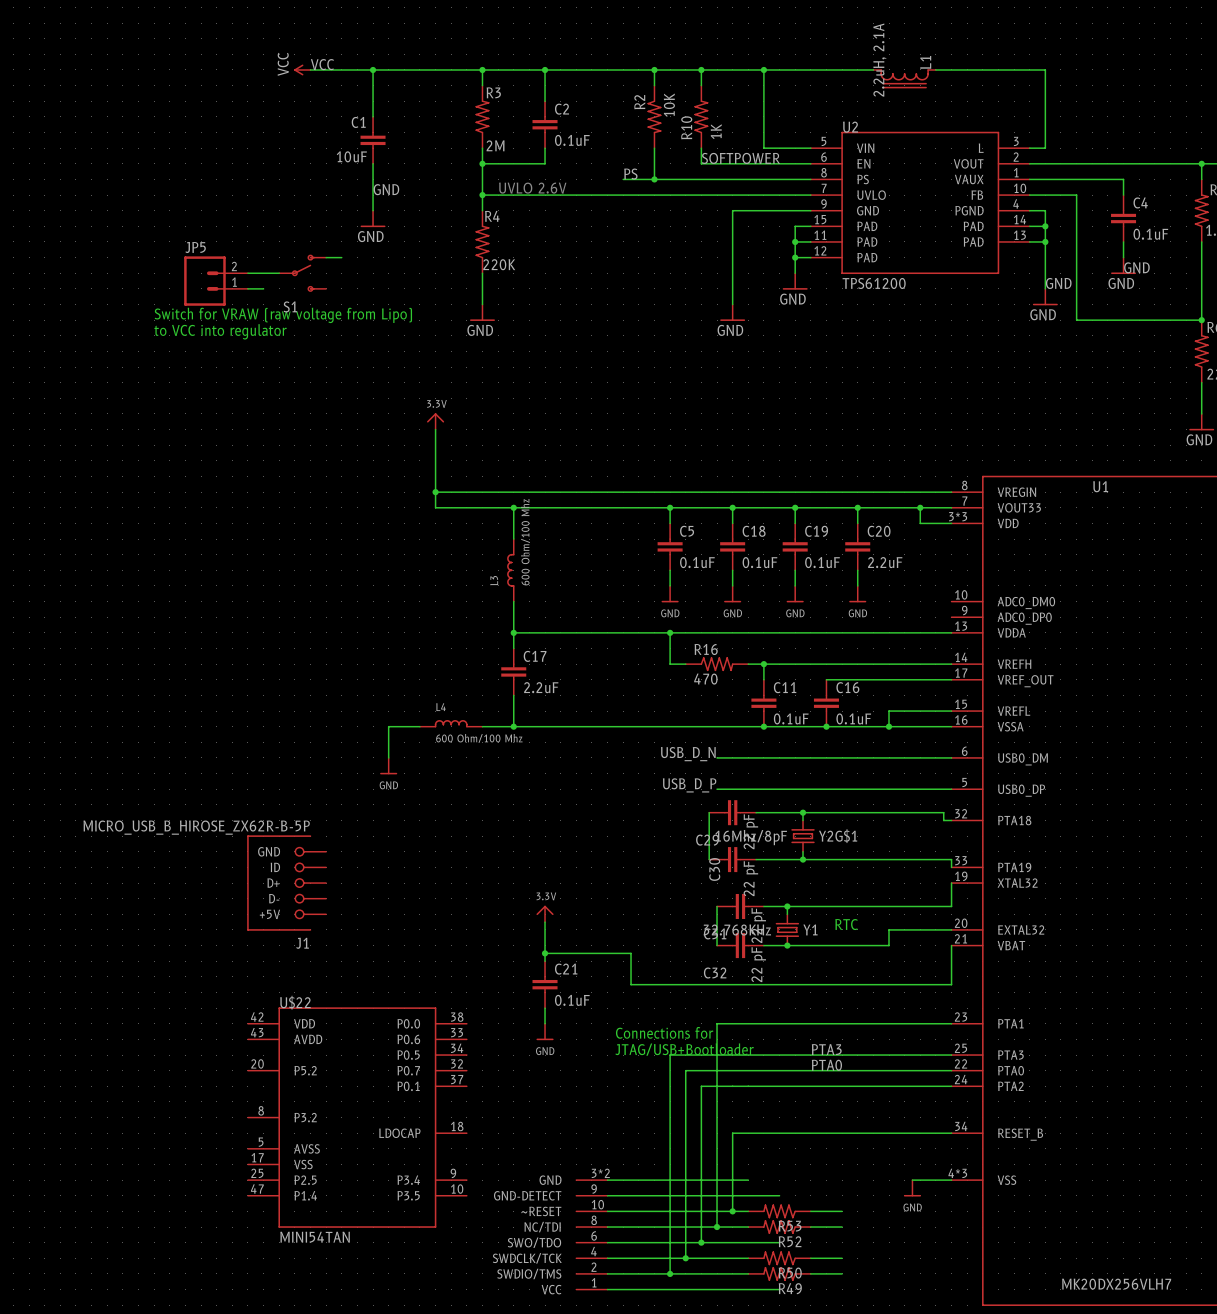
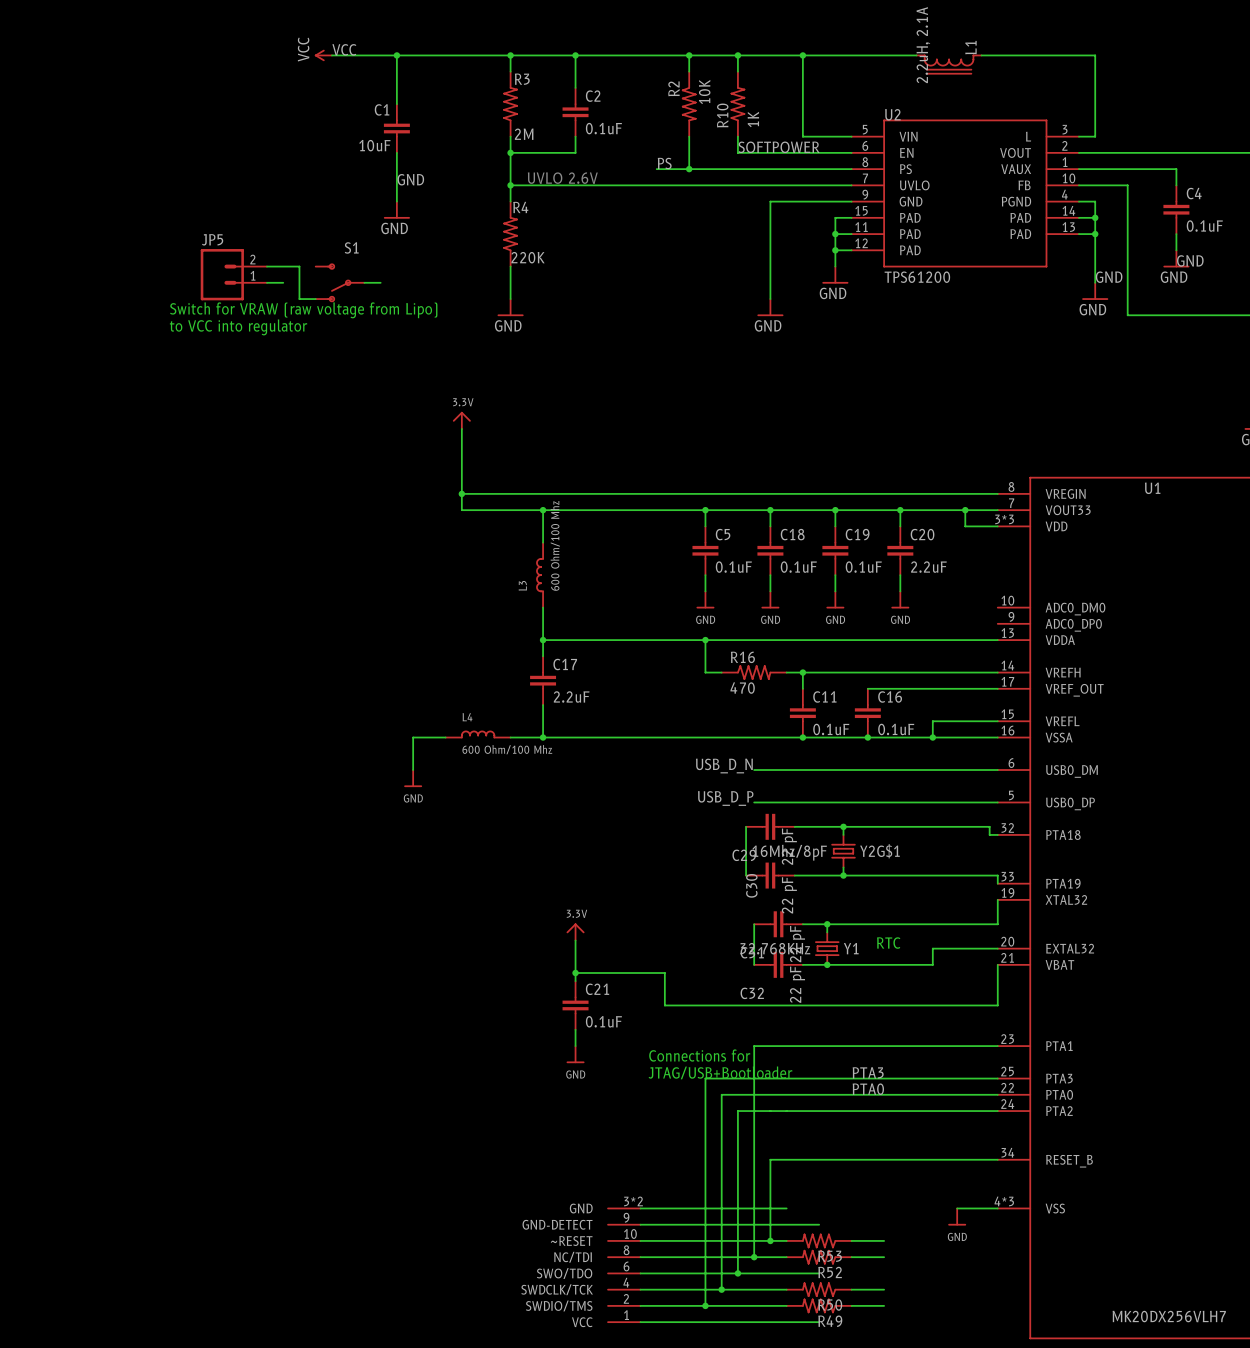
wire: (326, 257) (341, 257) -> (364, 282) (380, 282)
wire: none -> (299, 266) (299, 299) (315, 299)
S1 rotation: 0° (303, 273) -> 180° (339, 282)
J1: MICRO_USB_B_HIROSE_ZX62R-B-5P (286, 883) -> none
U$22: MINI54TAN (357, 1117) -> none

